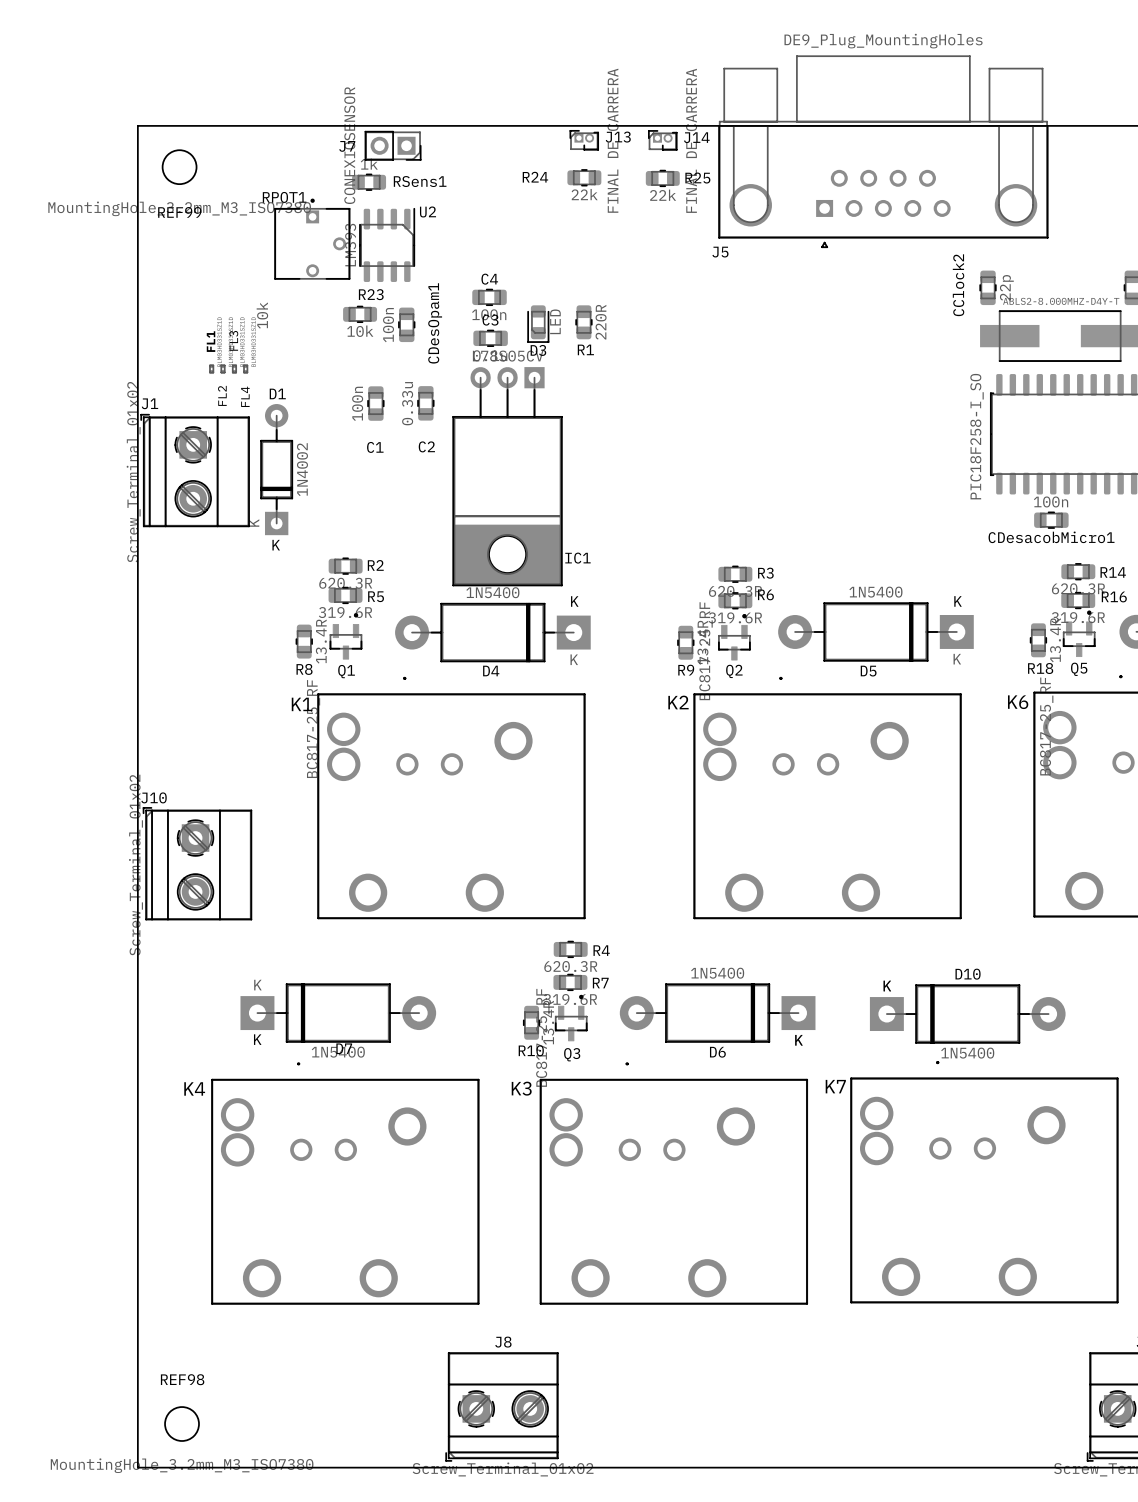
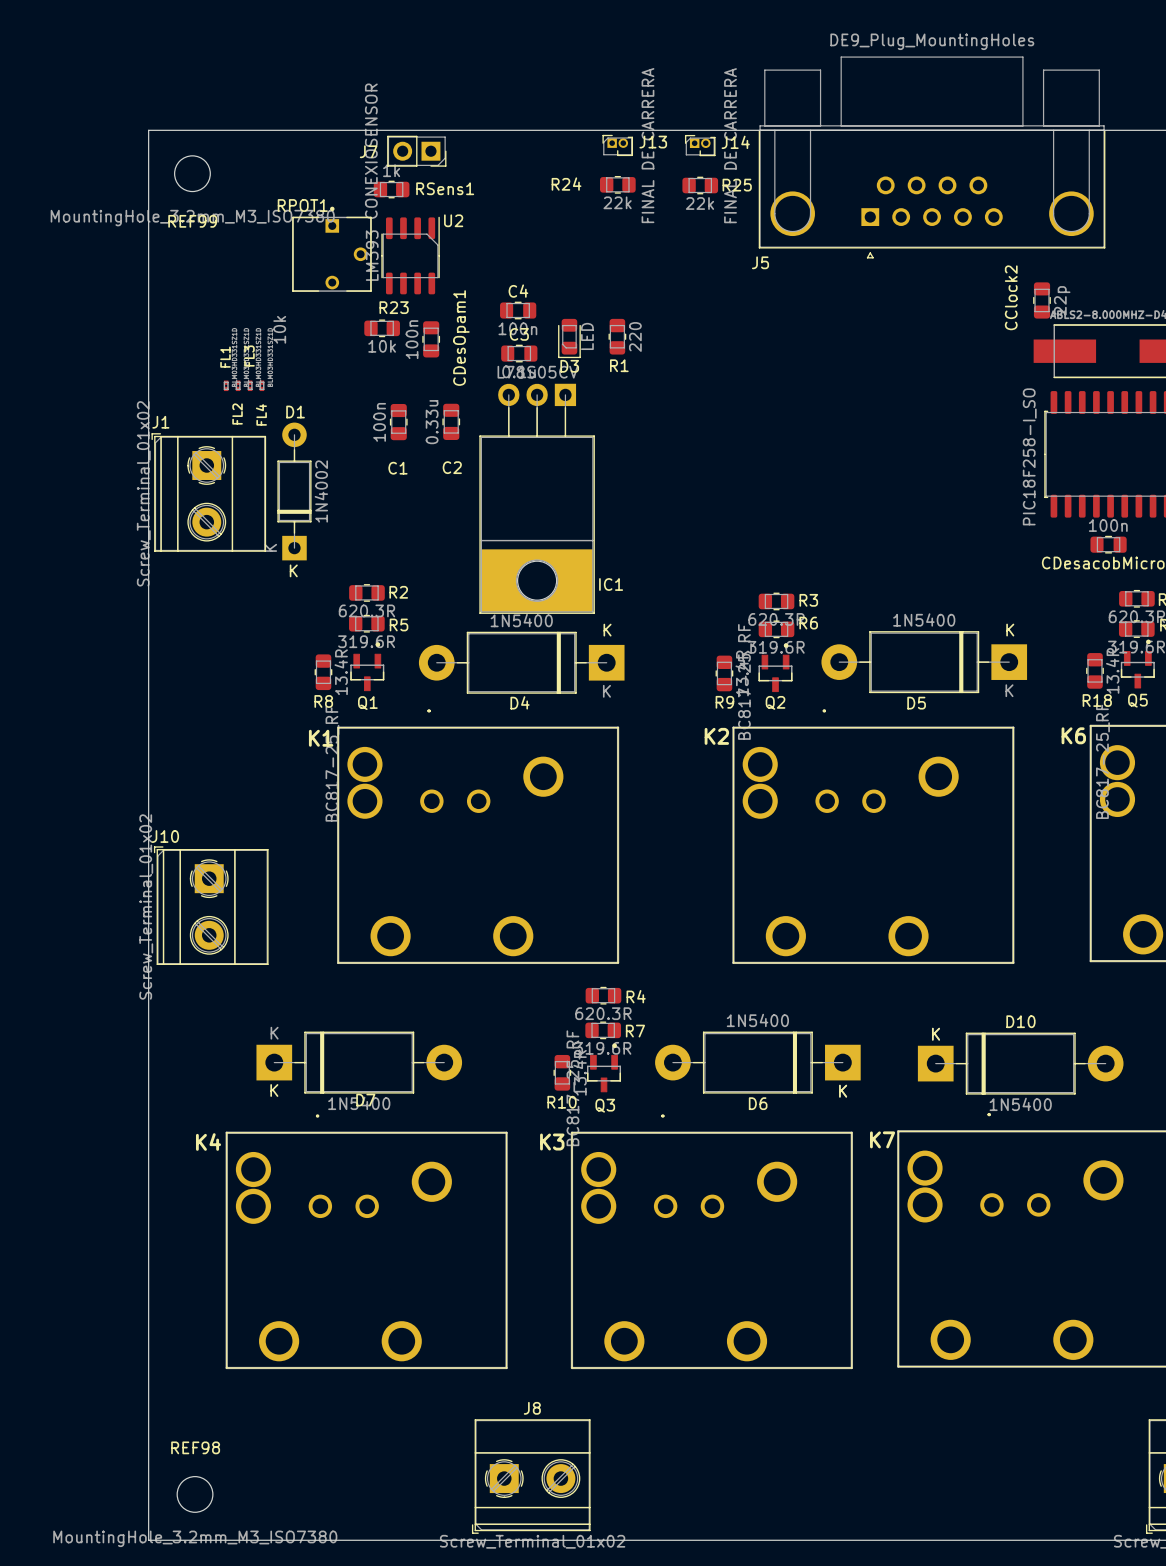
R1 value: 220R (601, 322) -> 220 (635, 336)

